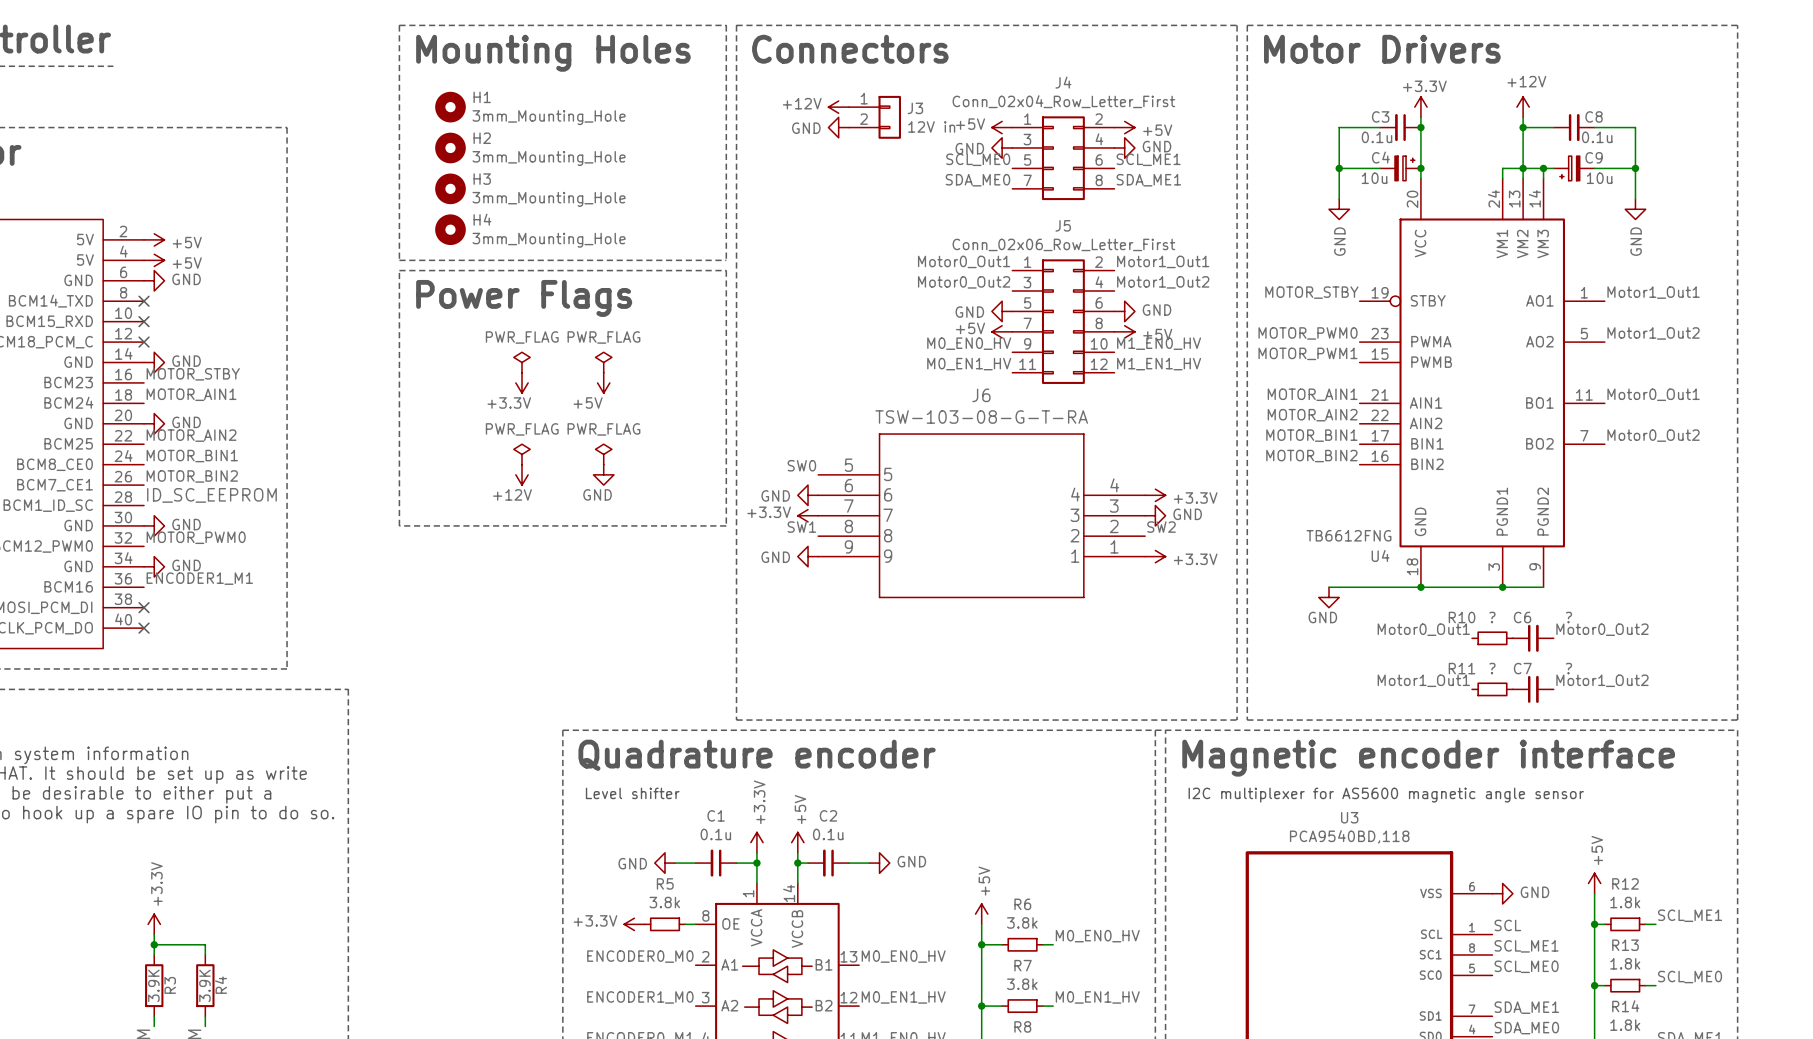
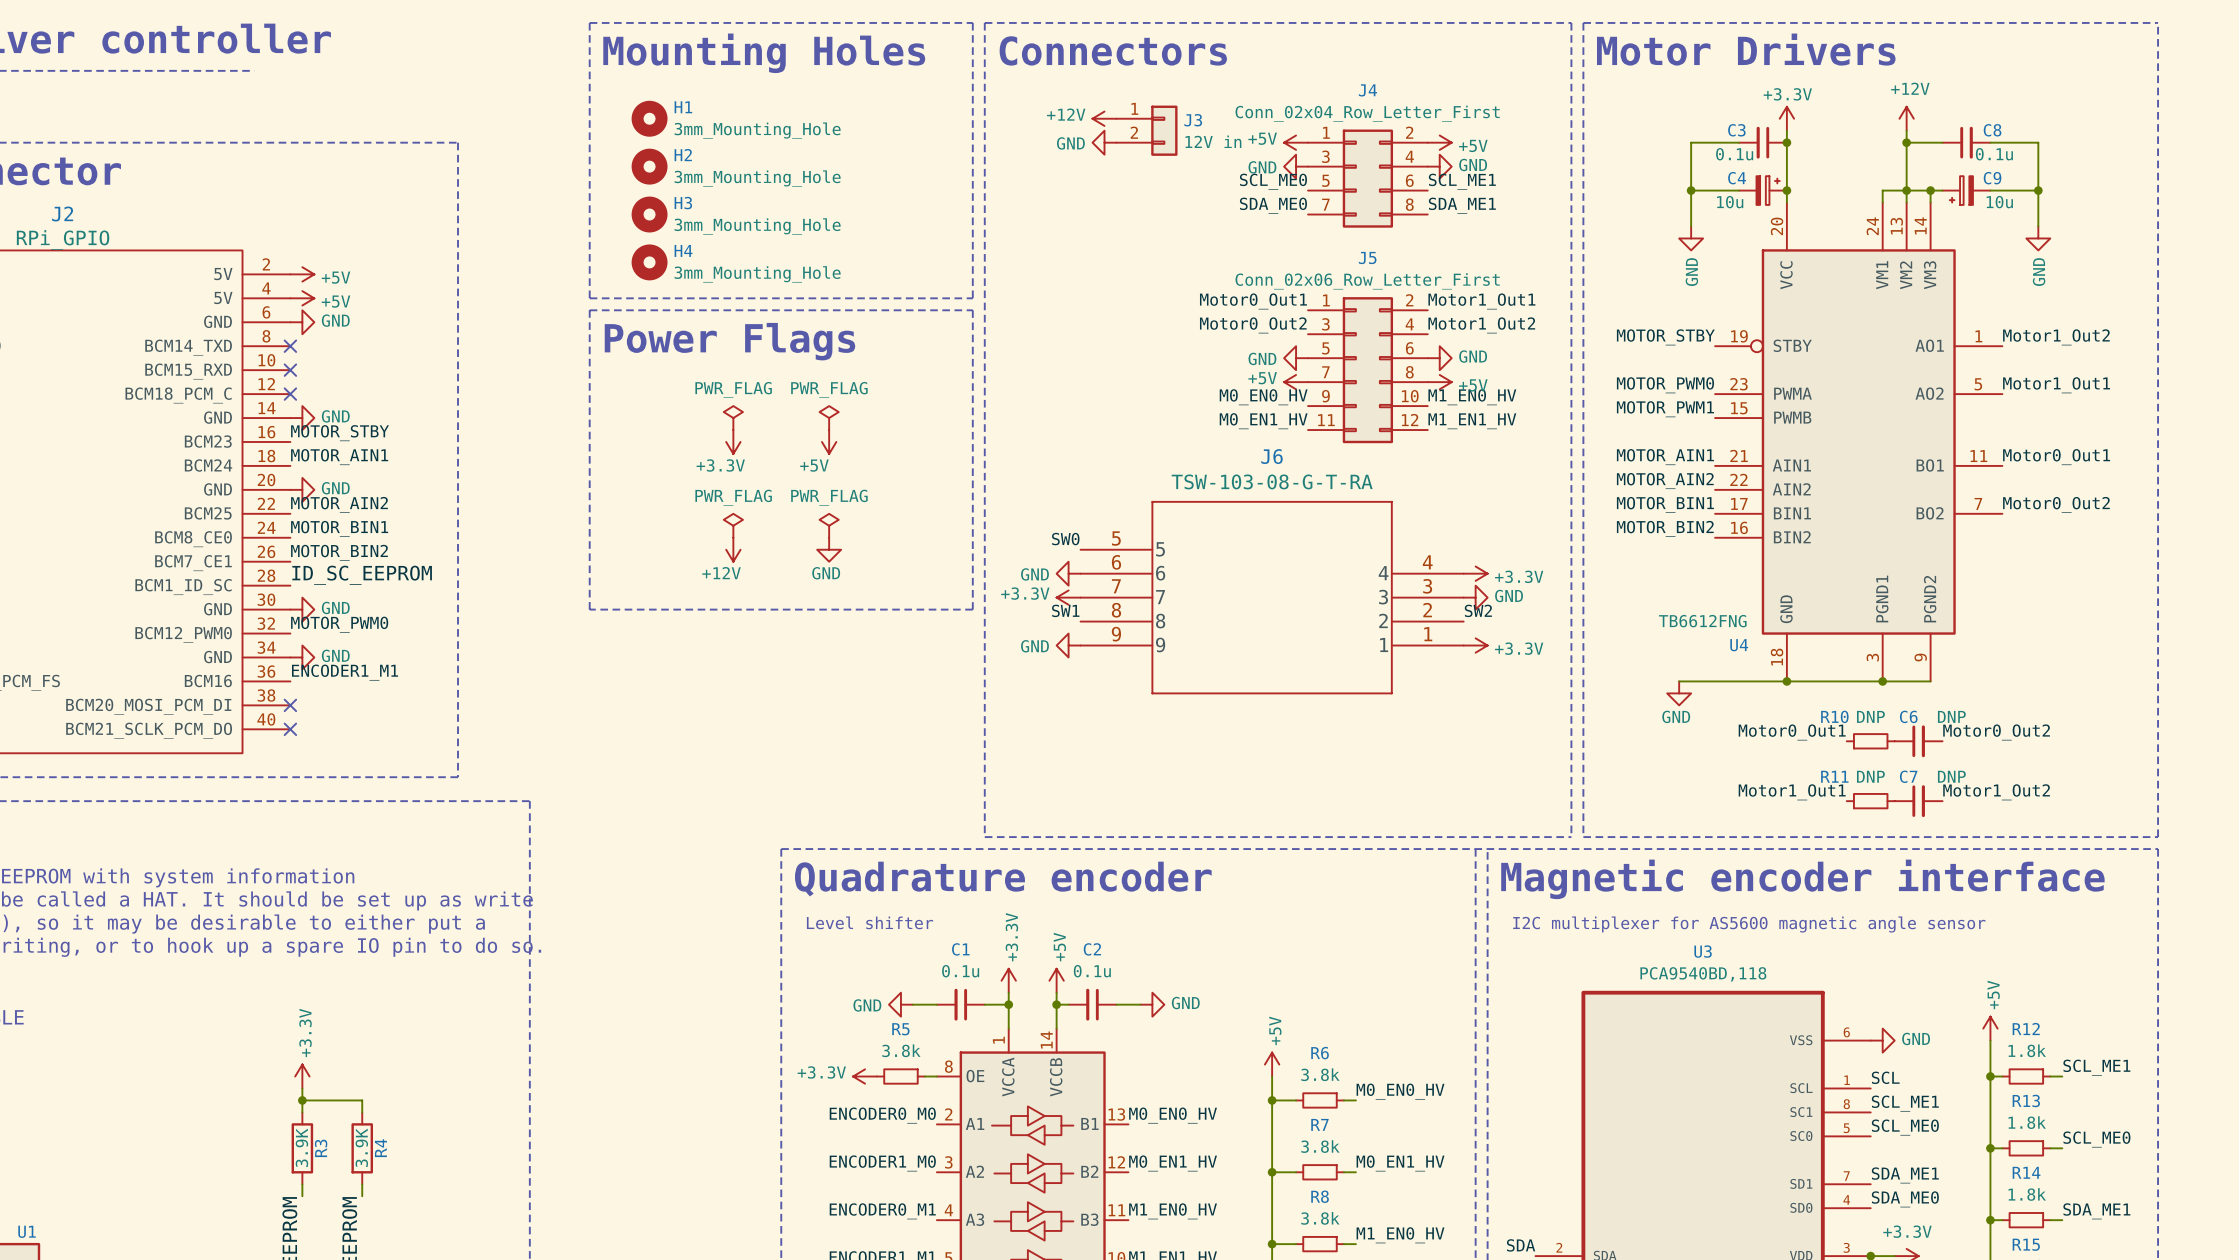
label: Motor1_Out1 (1653, 292) -> Motor1_Out2 (2056, 337)
label: Motor1_Out2 (1653, 333) -> Motor1_Out1 (2056, 385)
R10 value: ? (1492, 617) -> DNP (1870, 716)
C6 value: ? (1568, 617) -> DNP (1951, 716)
R11 value: ? (1492, 668) -> DNP (1870, 776)
C7 value: ? (1568, 668) -> DNP (1951, 776)

